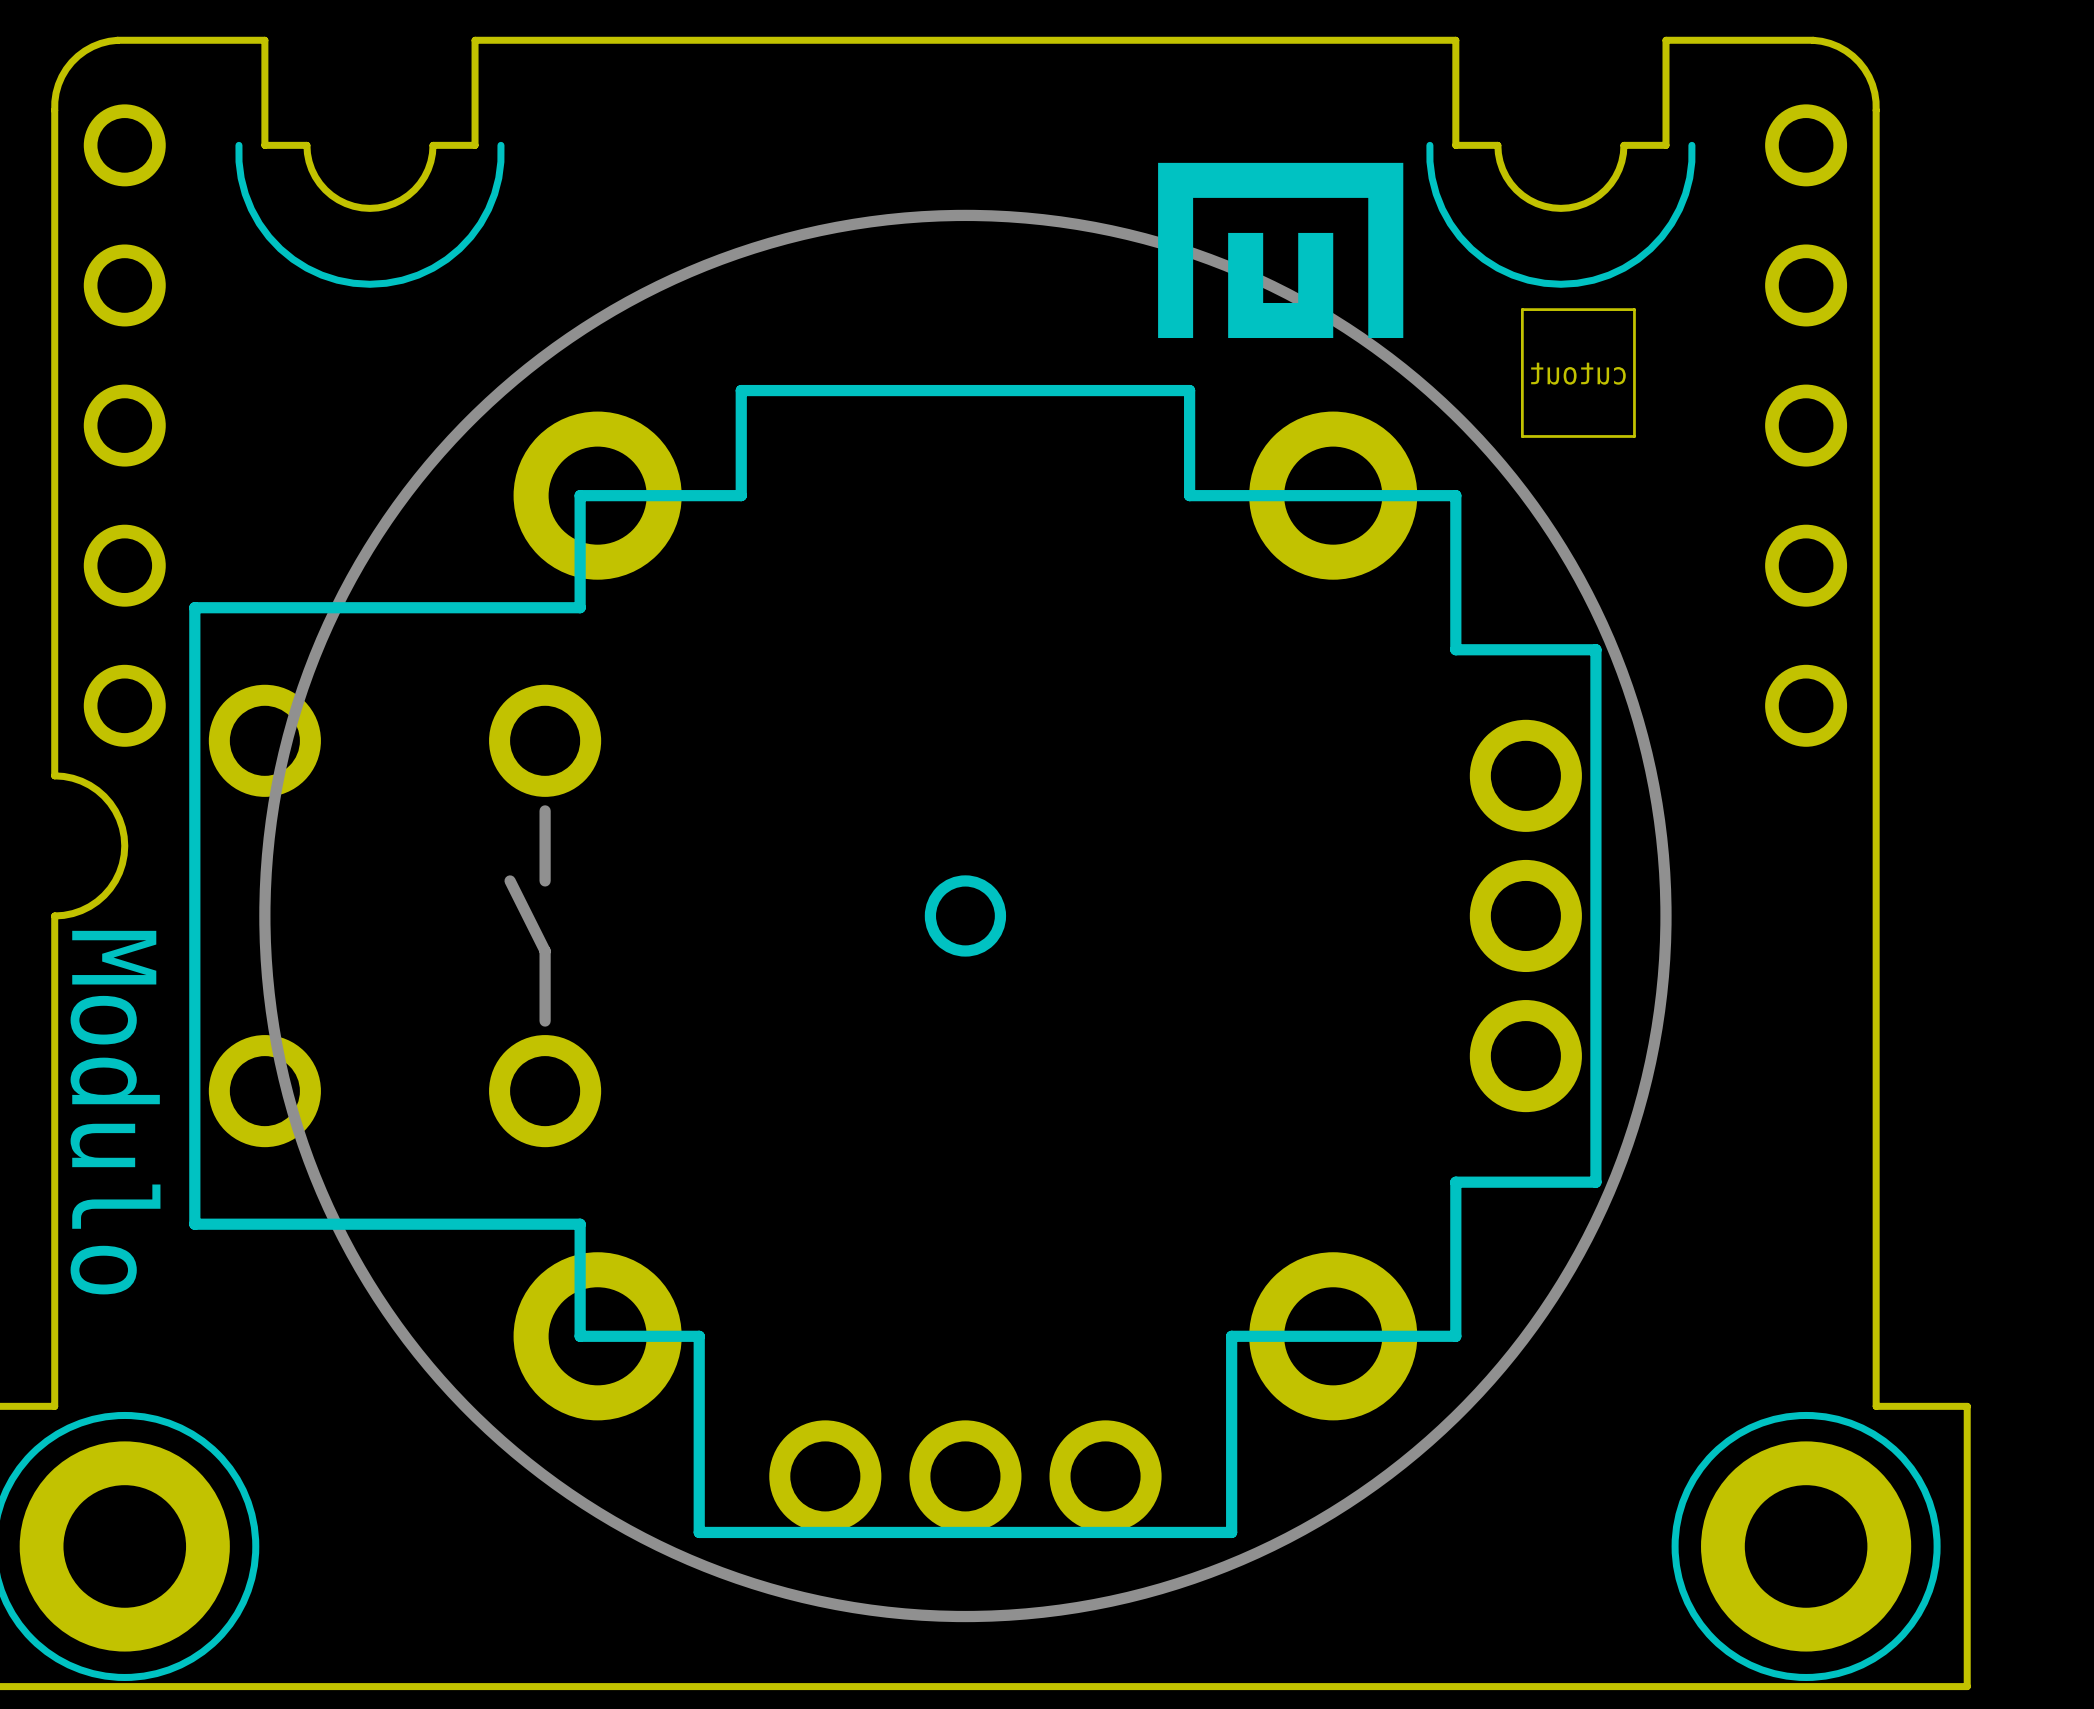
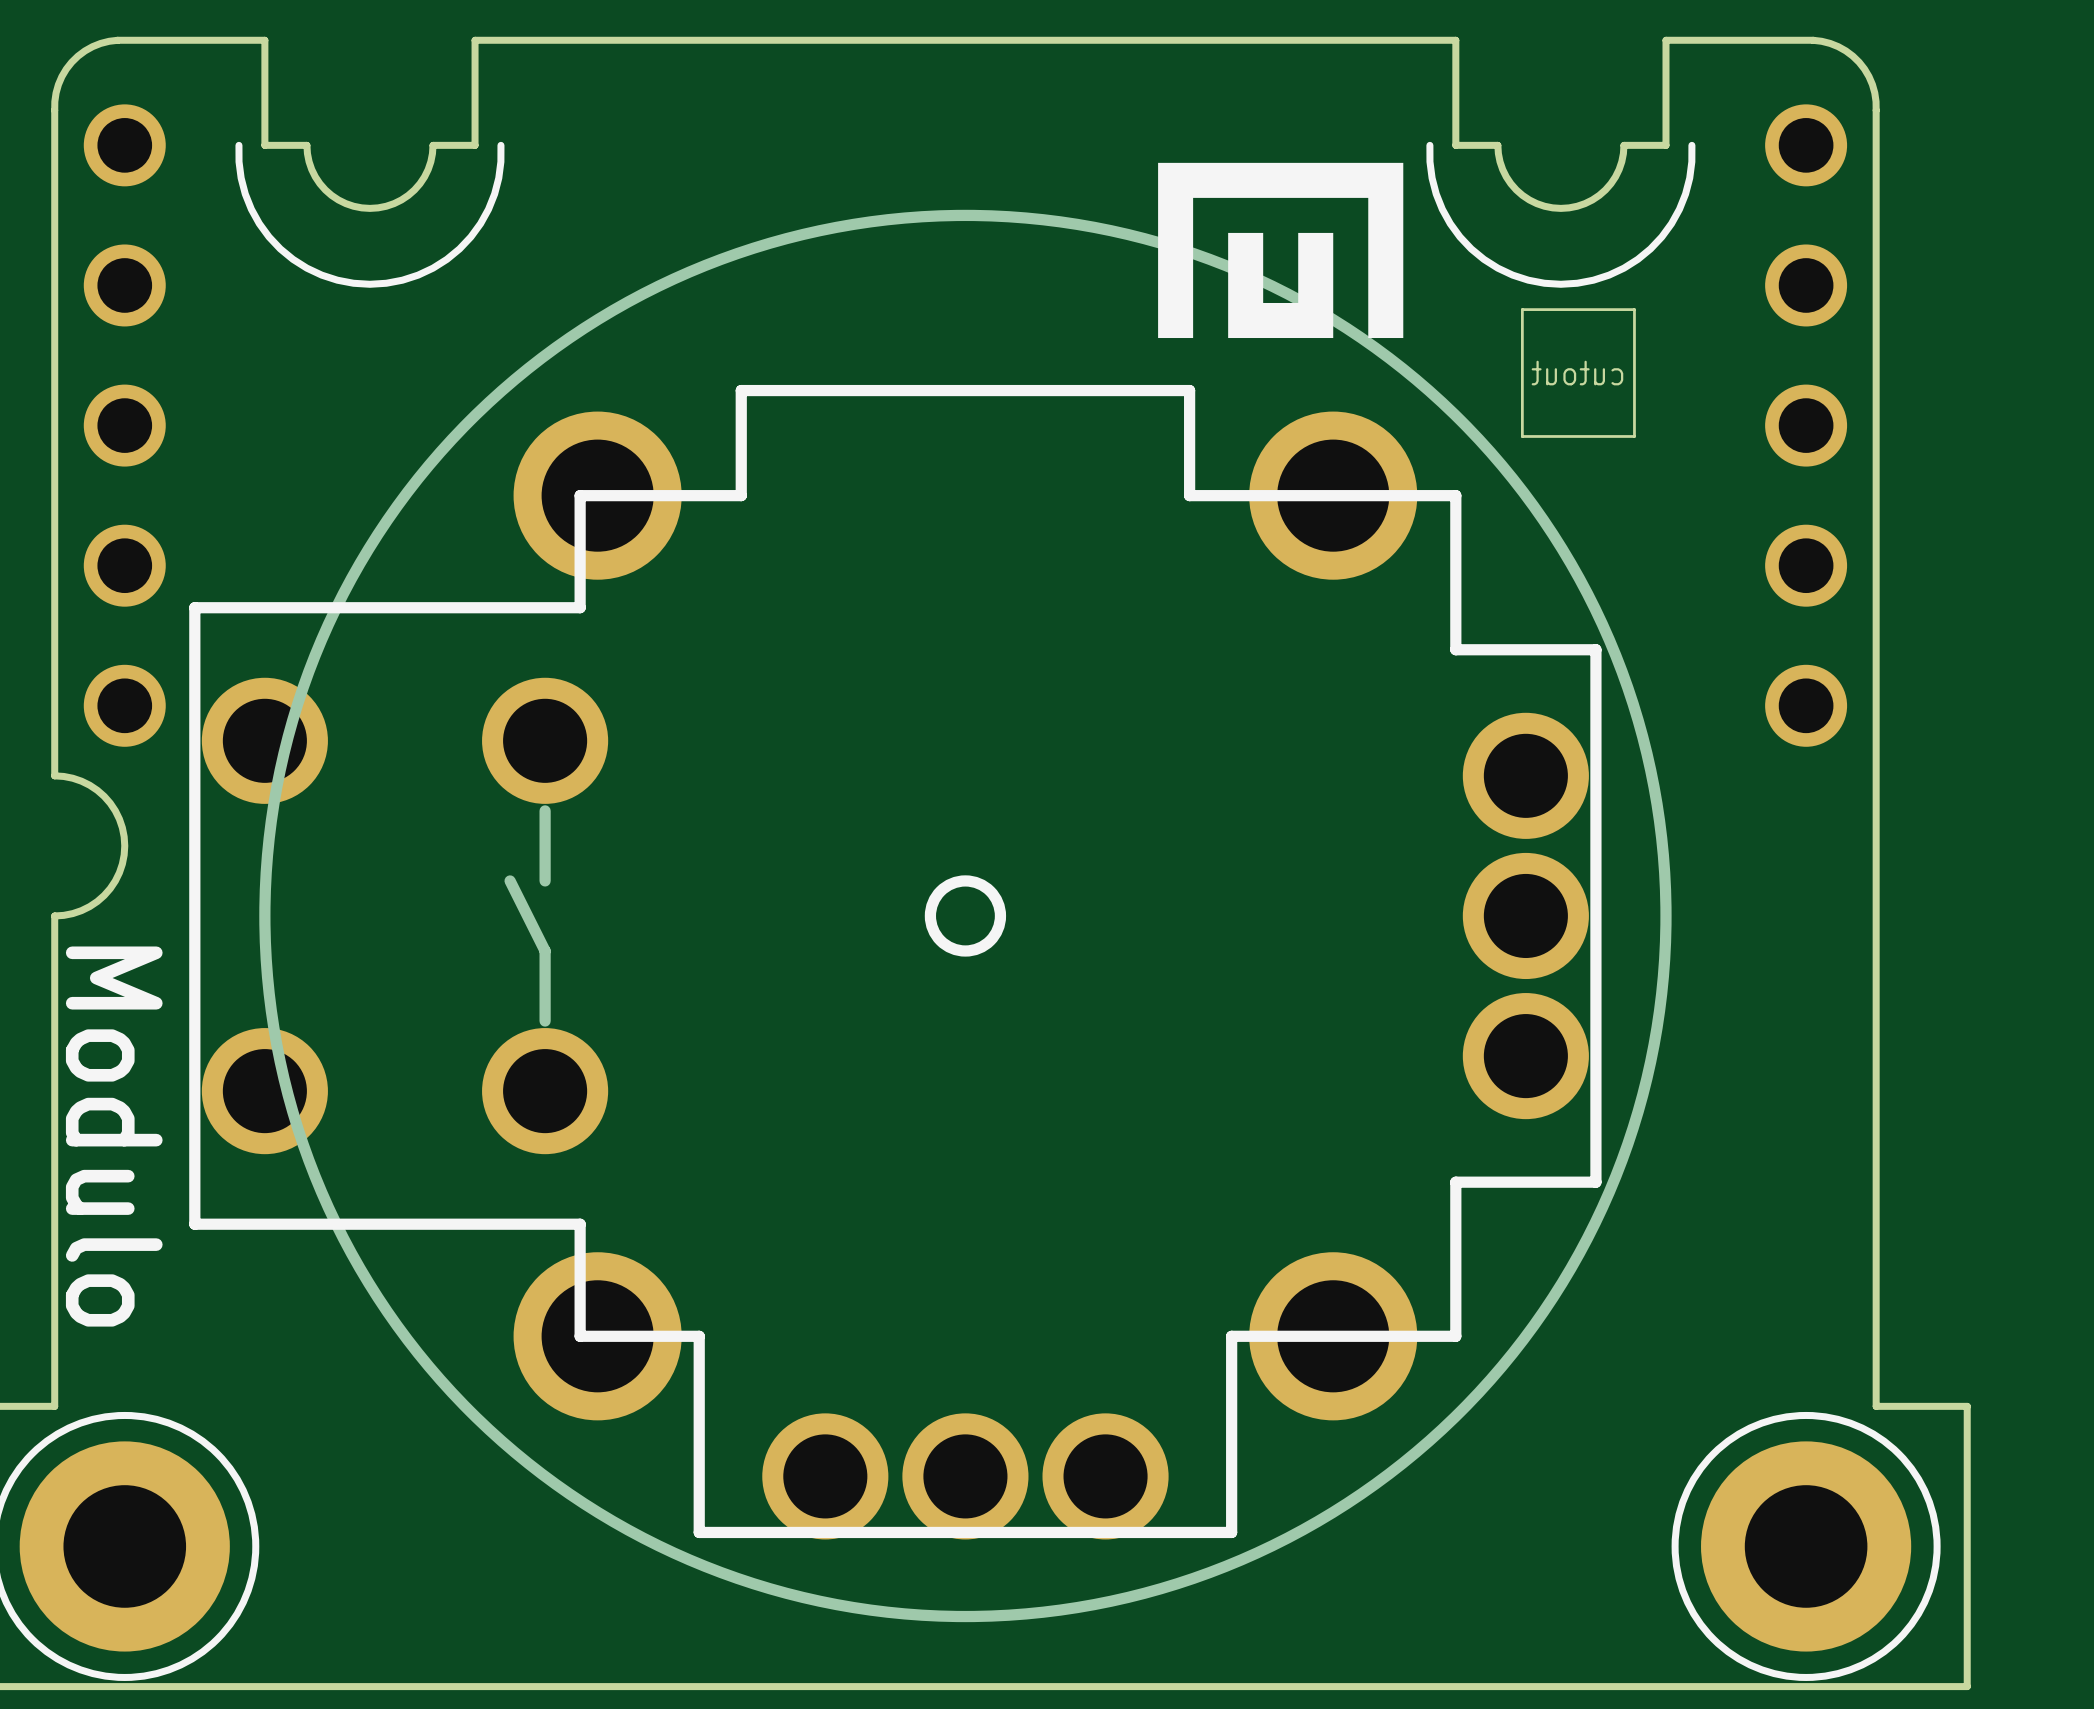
part footprint: [189, 209, 1672, 1623] -> [189, 209, 1672, 1623]

